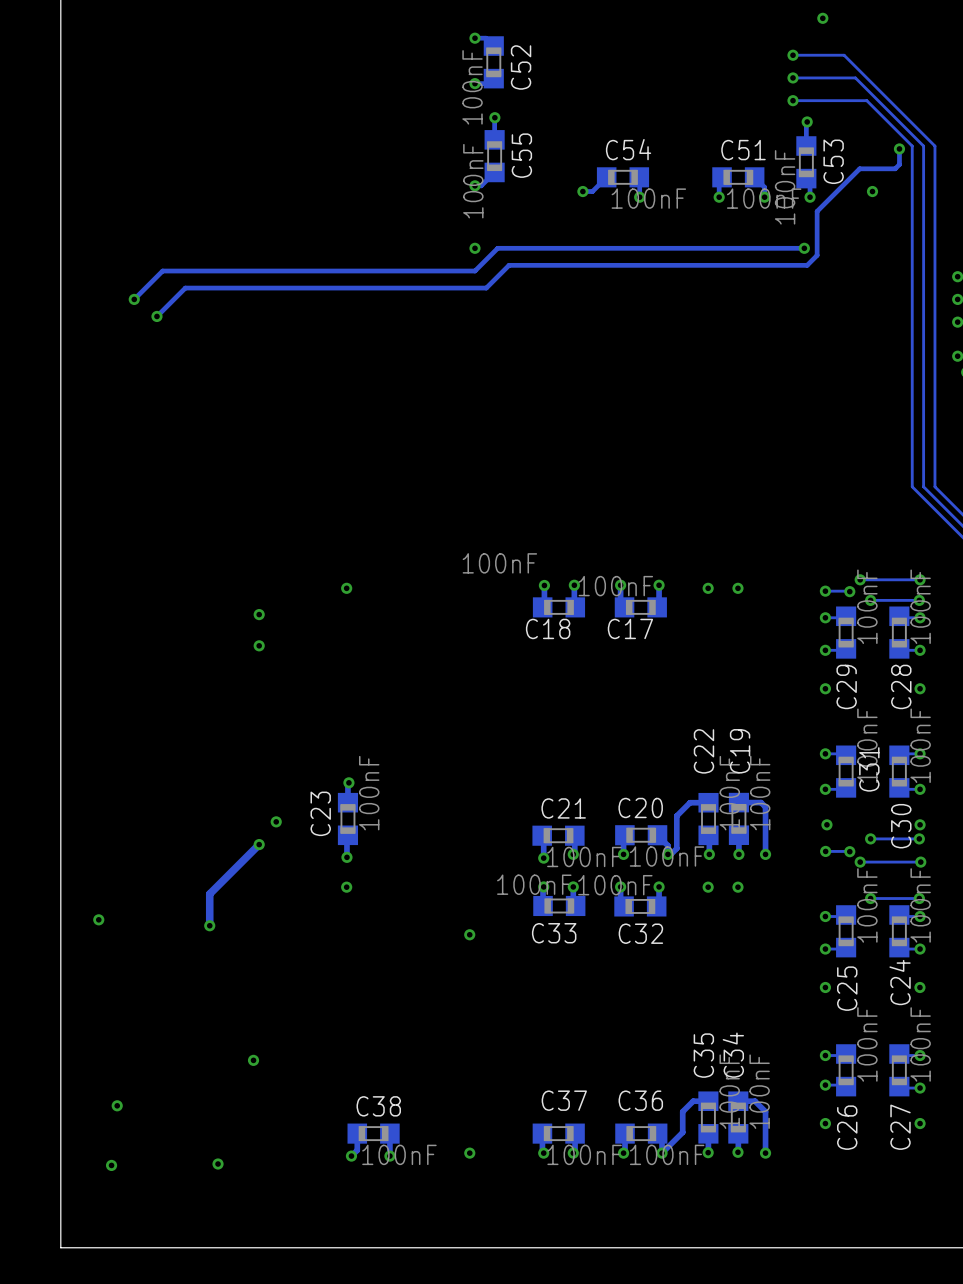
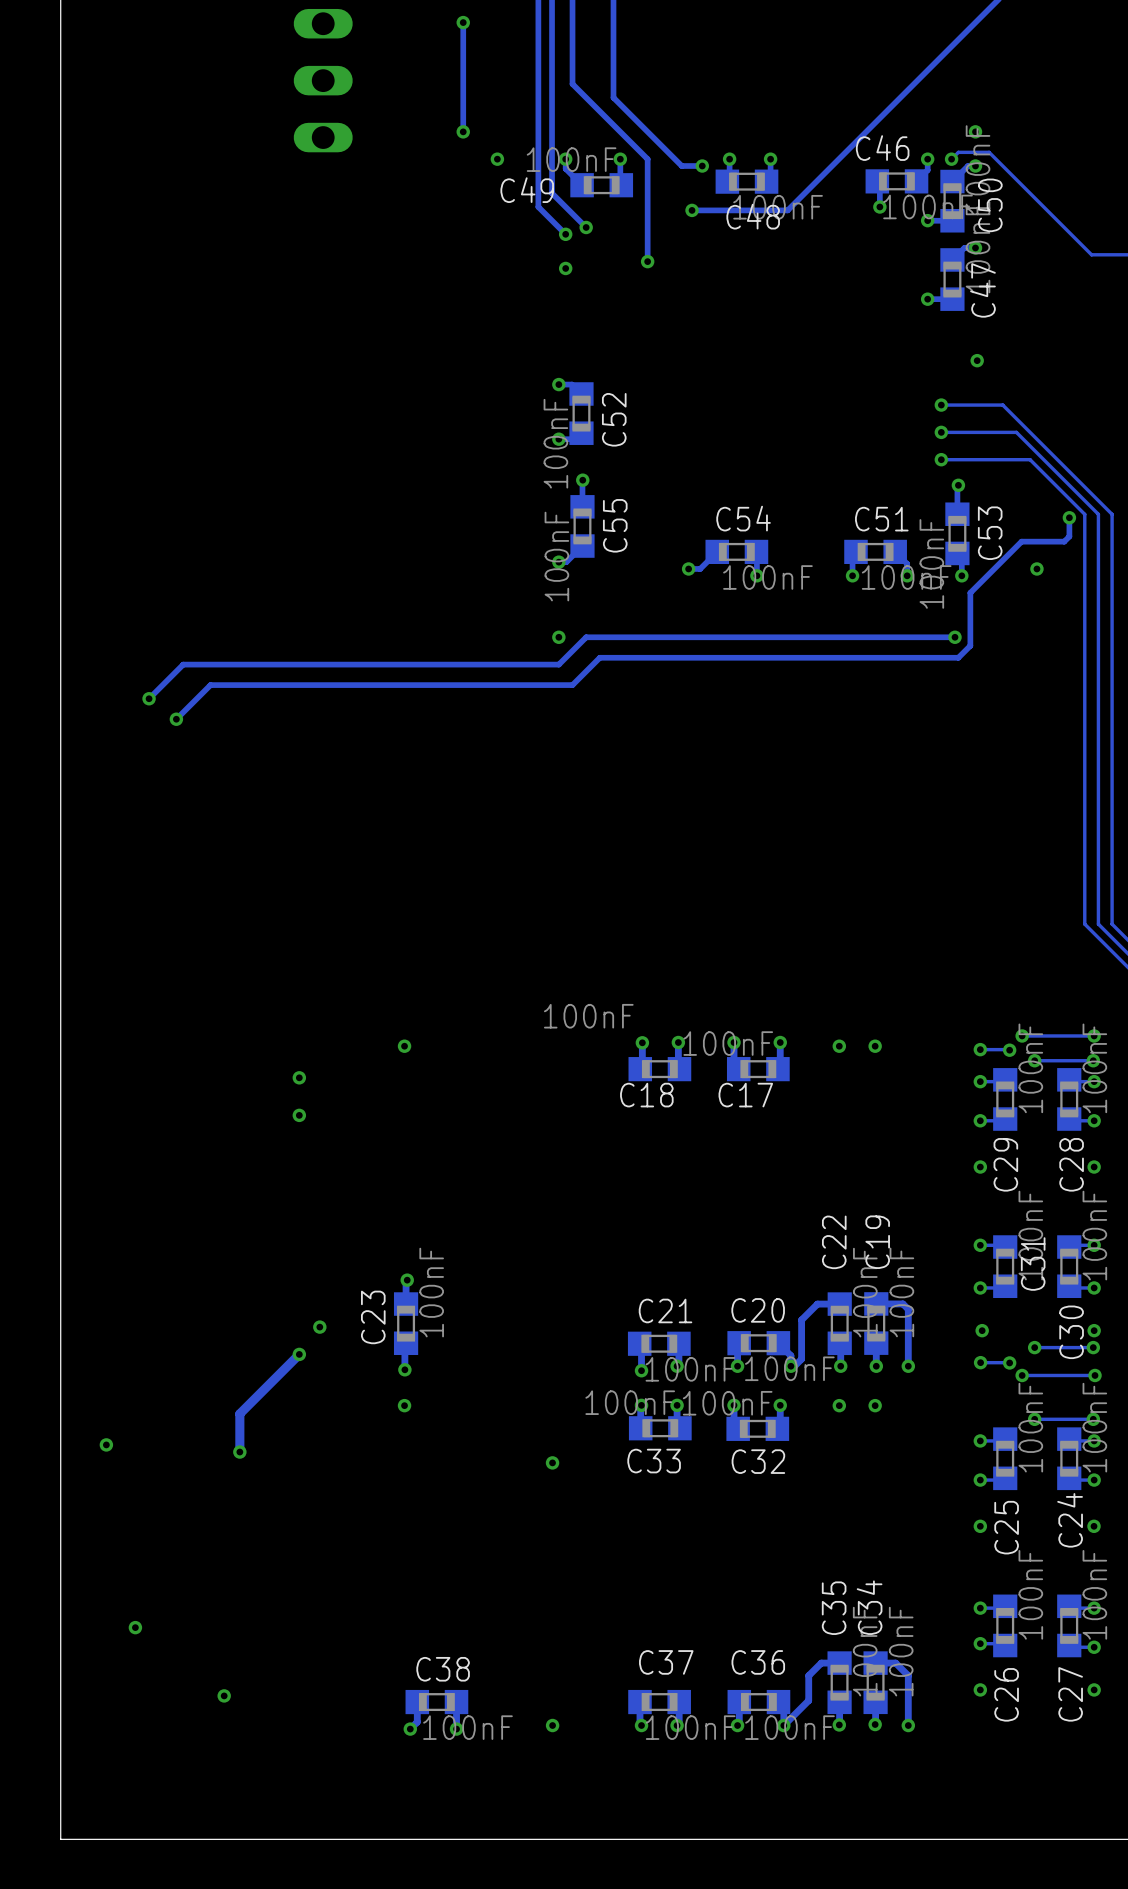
via: (253, 1060) -> none
via position: (117, 1105) -> (135, 1627)
via: none -> (224, 1695)
via: (218, 1164) -> none
via: (111, 1165) -> none

